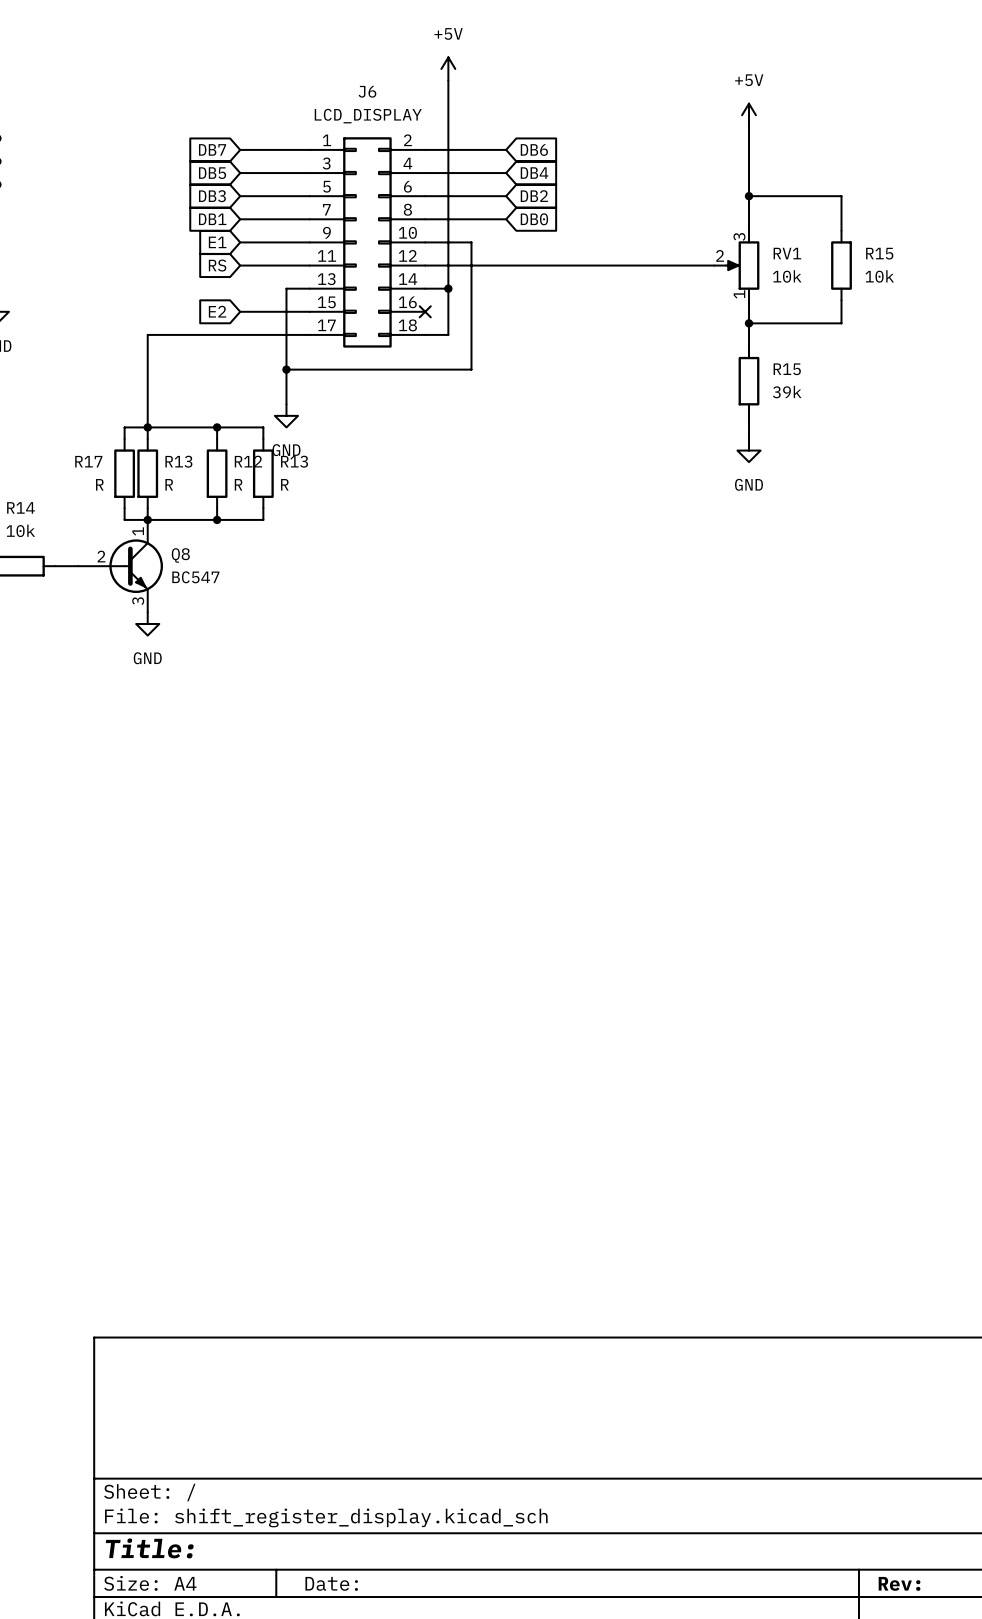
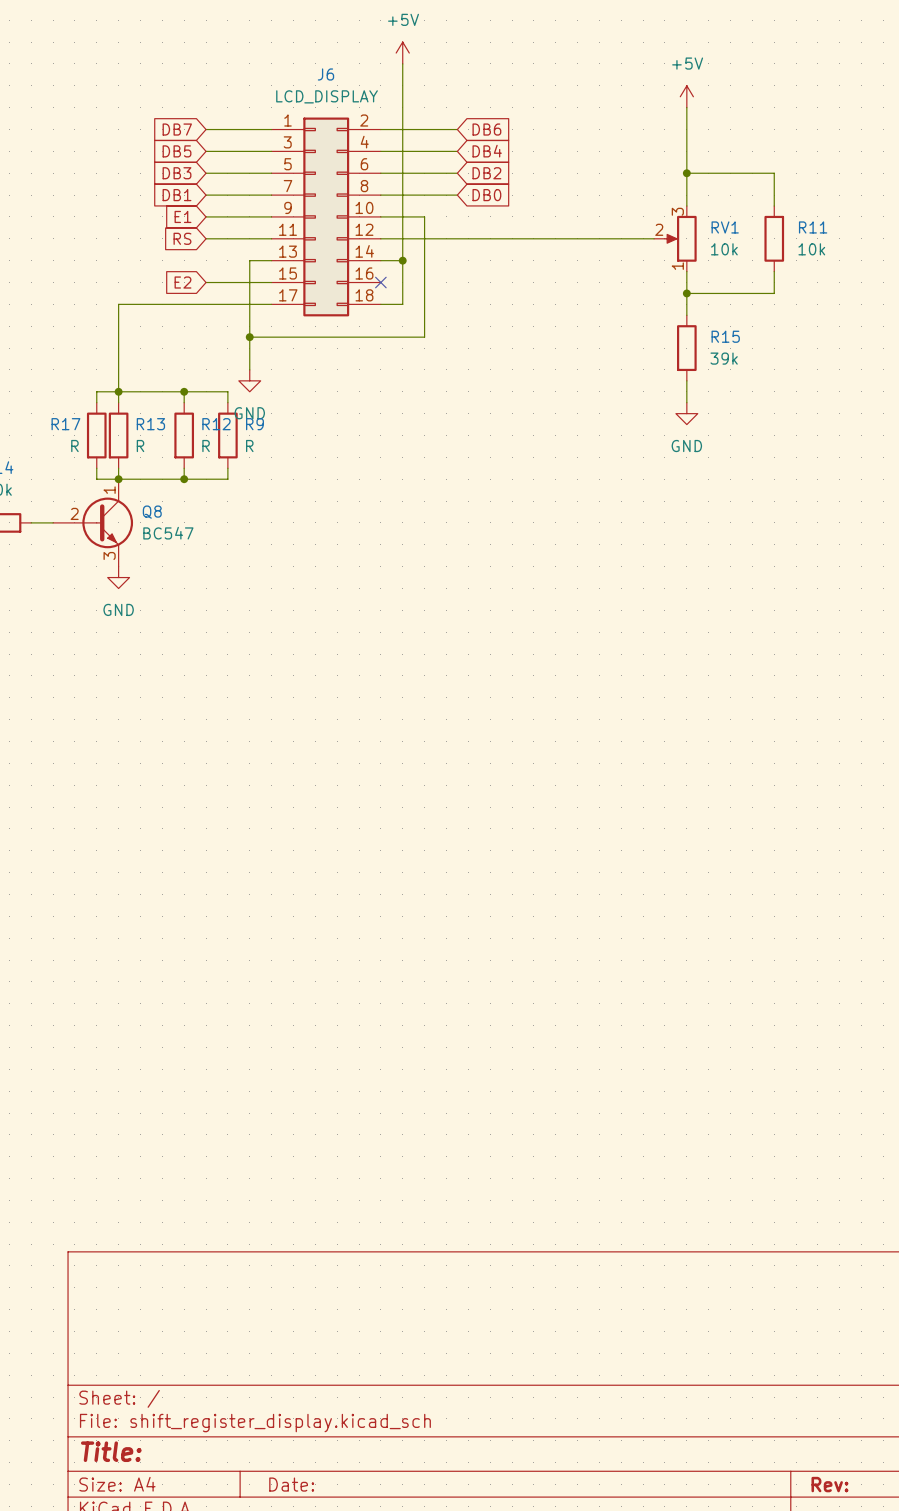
R15 name: R15 (879, 253) -> R11 (813, 227)
R13 name: R13 (294, 461) -> R9 (254, 424)

